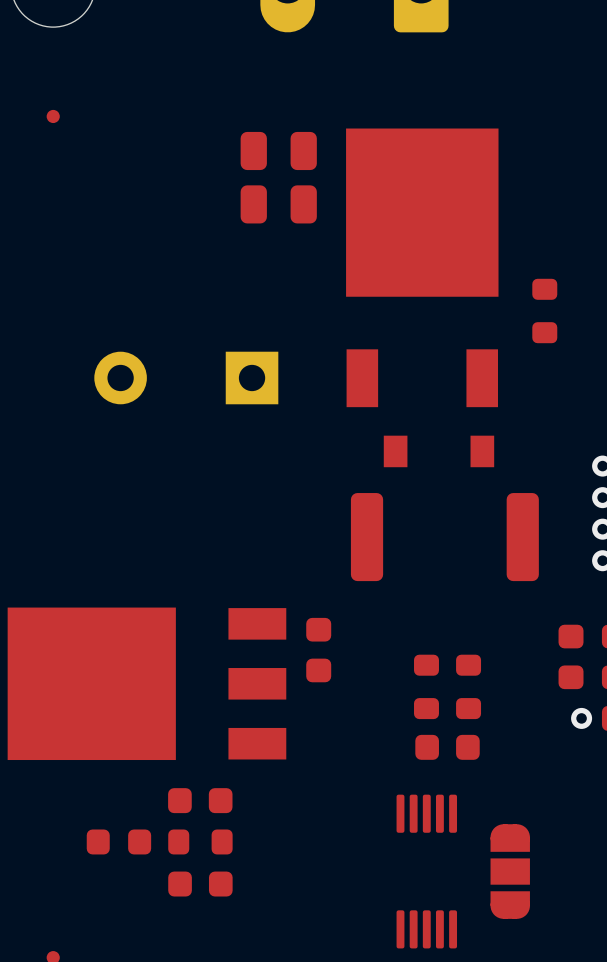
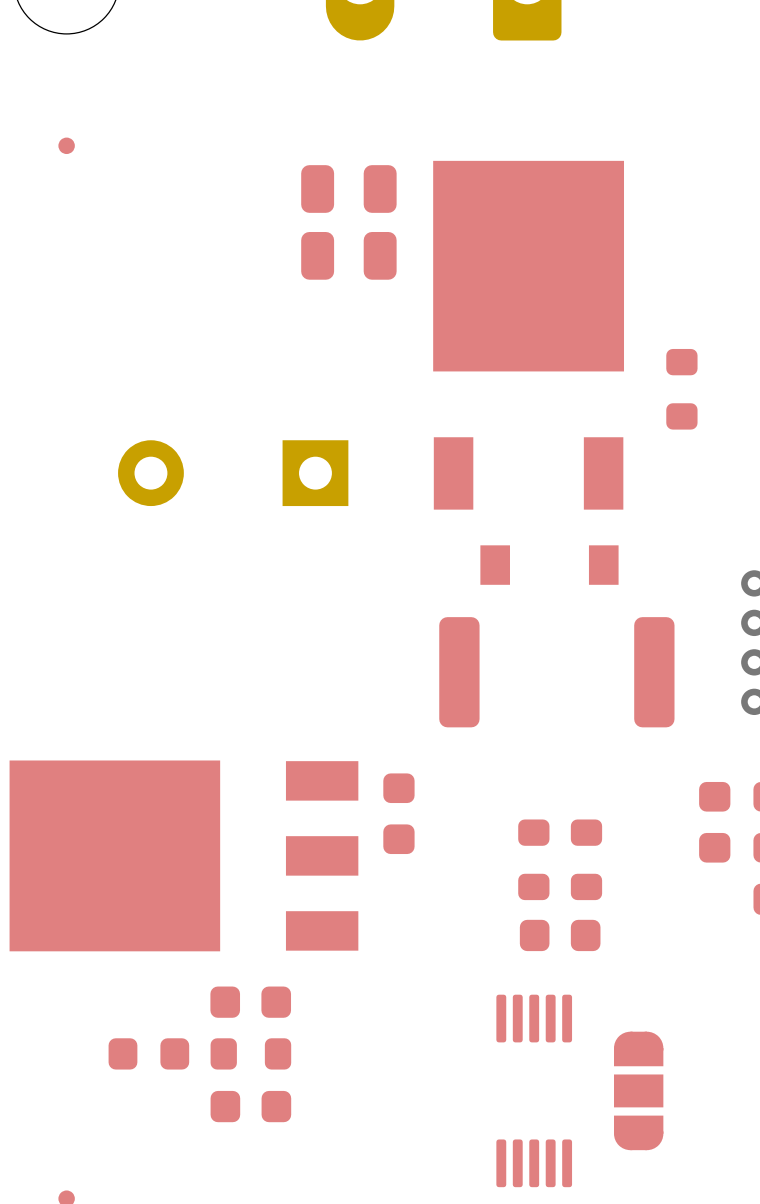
via: (581, 718) -> none

